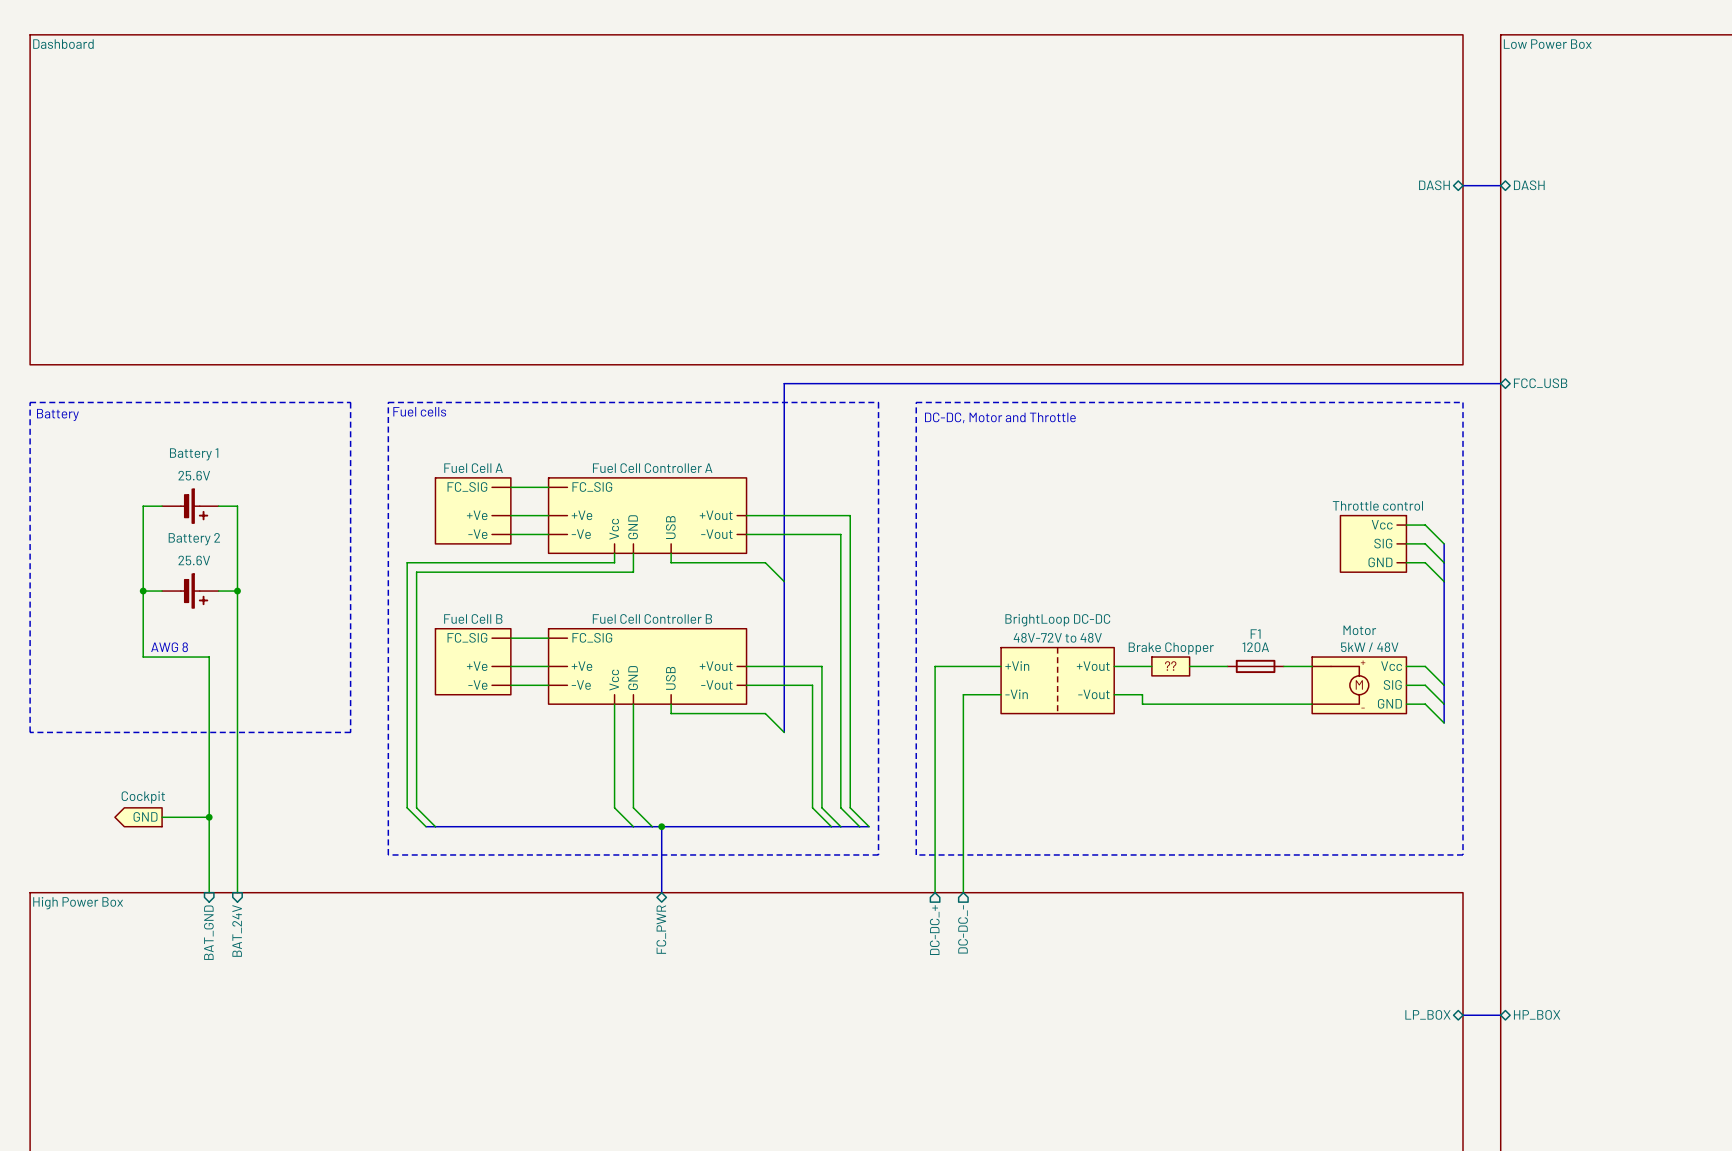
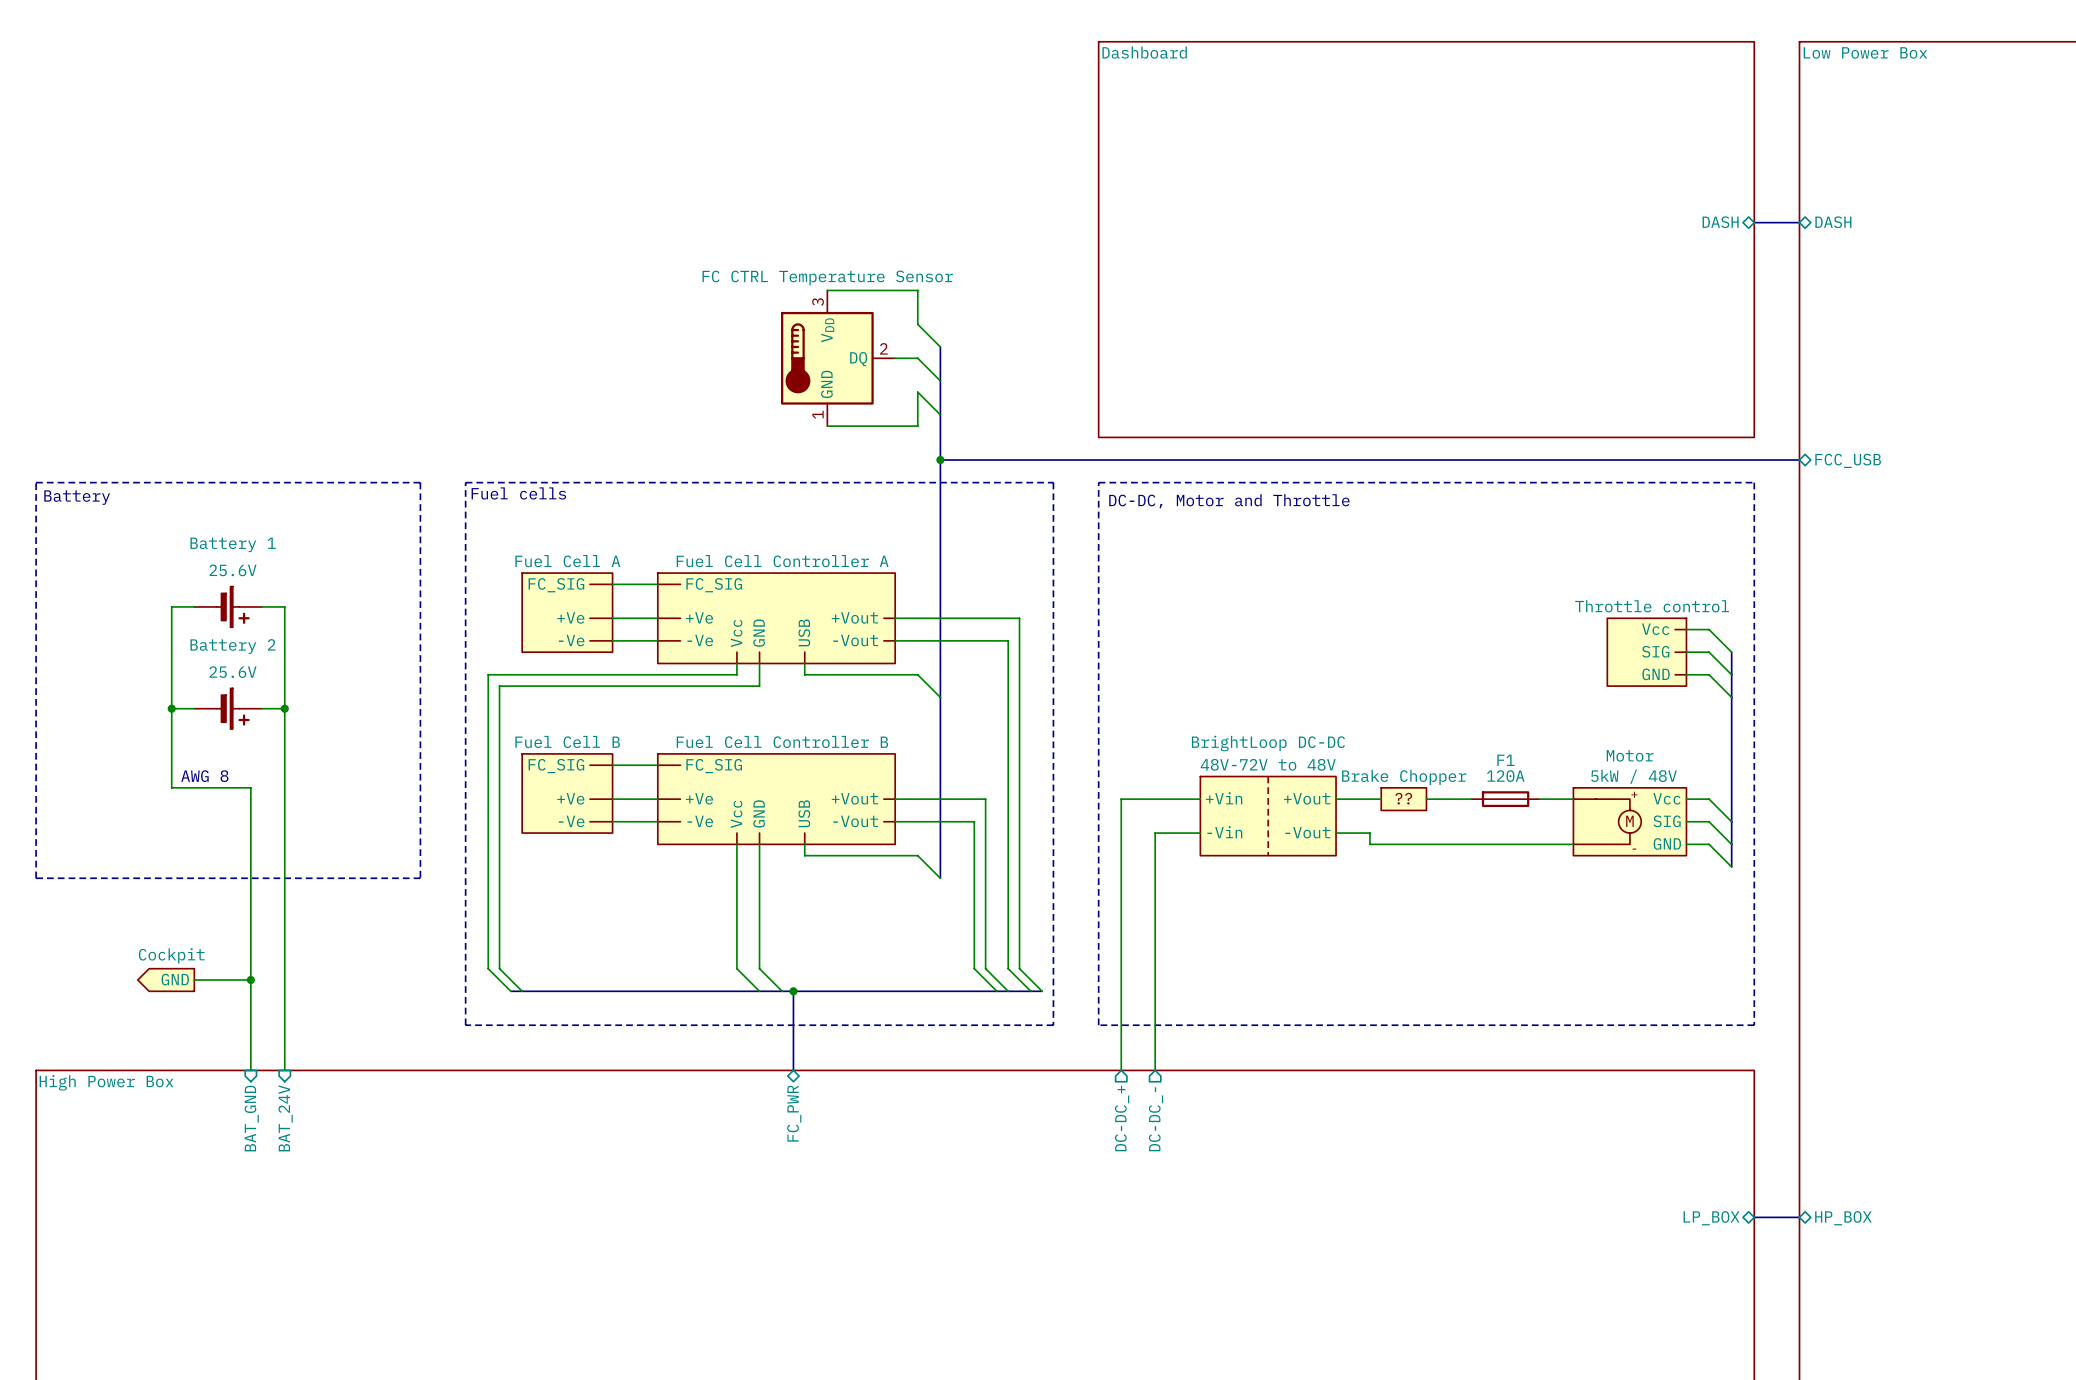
sheet Dashboard: (746, 199) -> none
sheet Dashboard: none -> (1426, 239)
wire: none -> (827, 290) (917, 290) (917, 324) (940, 346)
bus: none -> (940, 346) (940, 460)
part: none -> (838, 358)
wire: none -> (895, 358) (917, 358) (940, 380)
wire: none -> (940, 414) (917, 392) (917, 426) (827, 426)
junction: none -> (940, 460)

